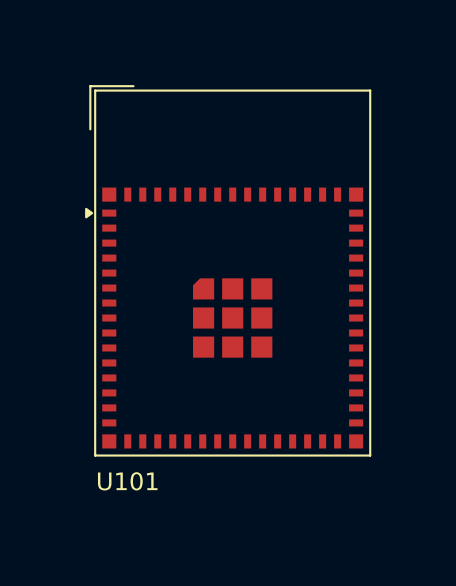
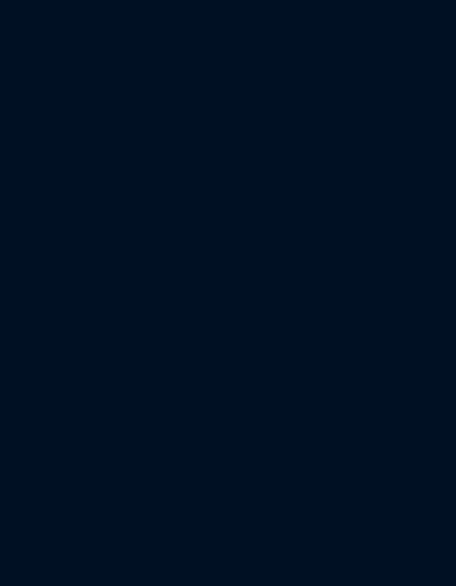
U101: (228, 270) -> none

